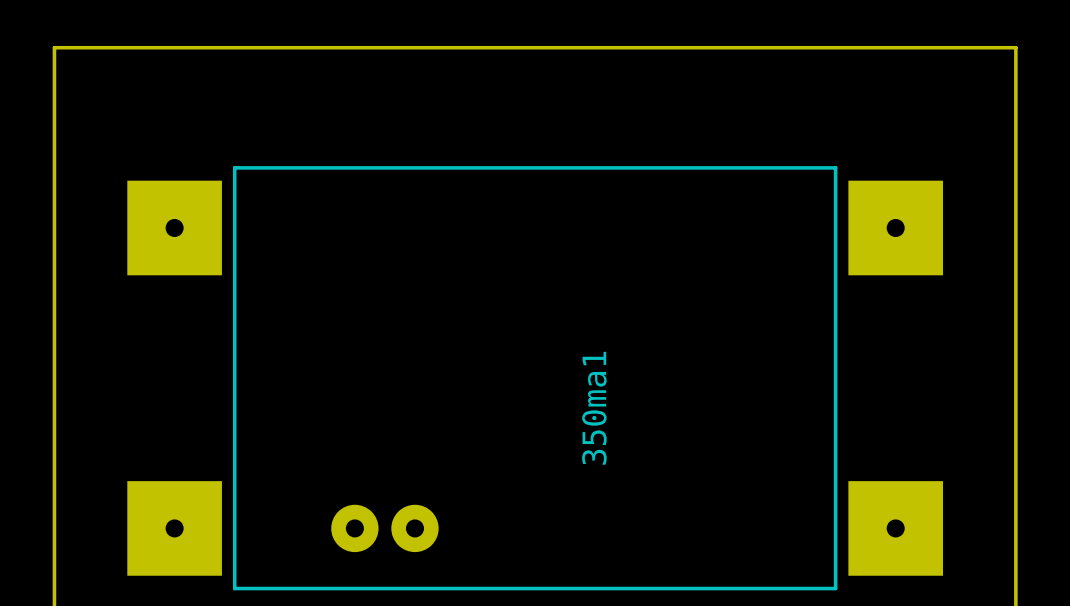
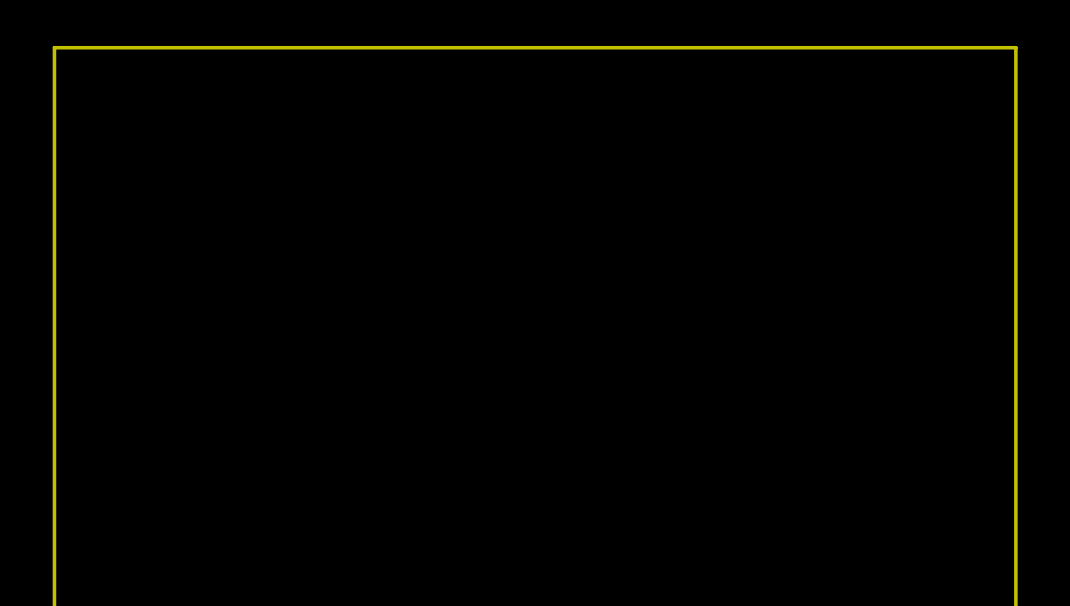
350ma1: (535, 378) -> none

